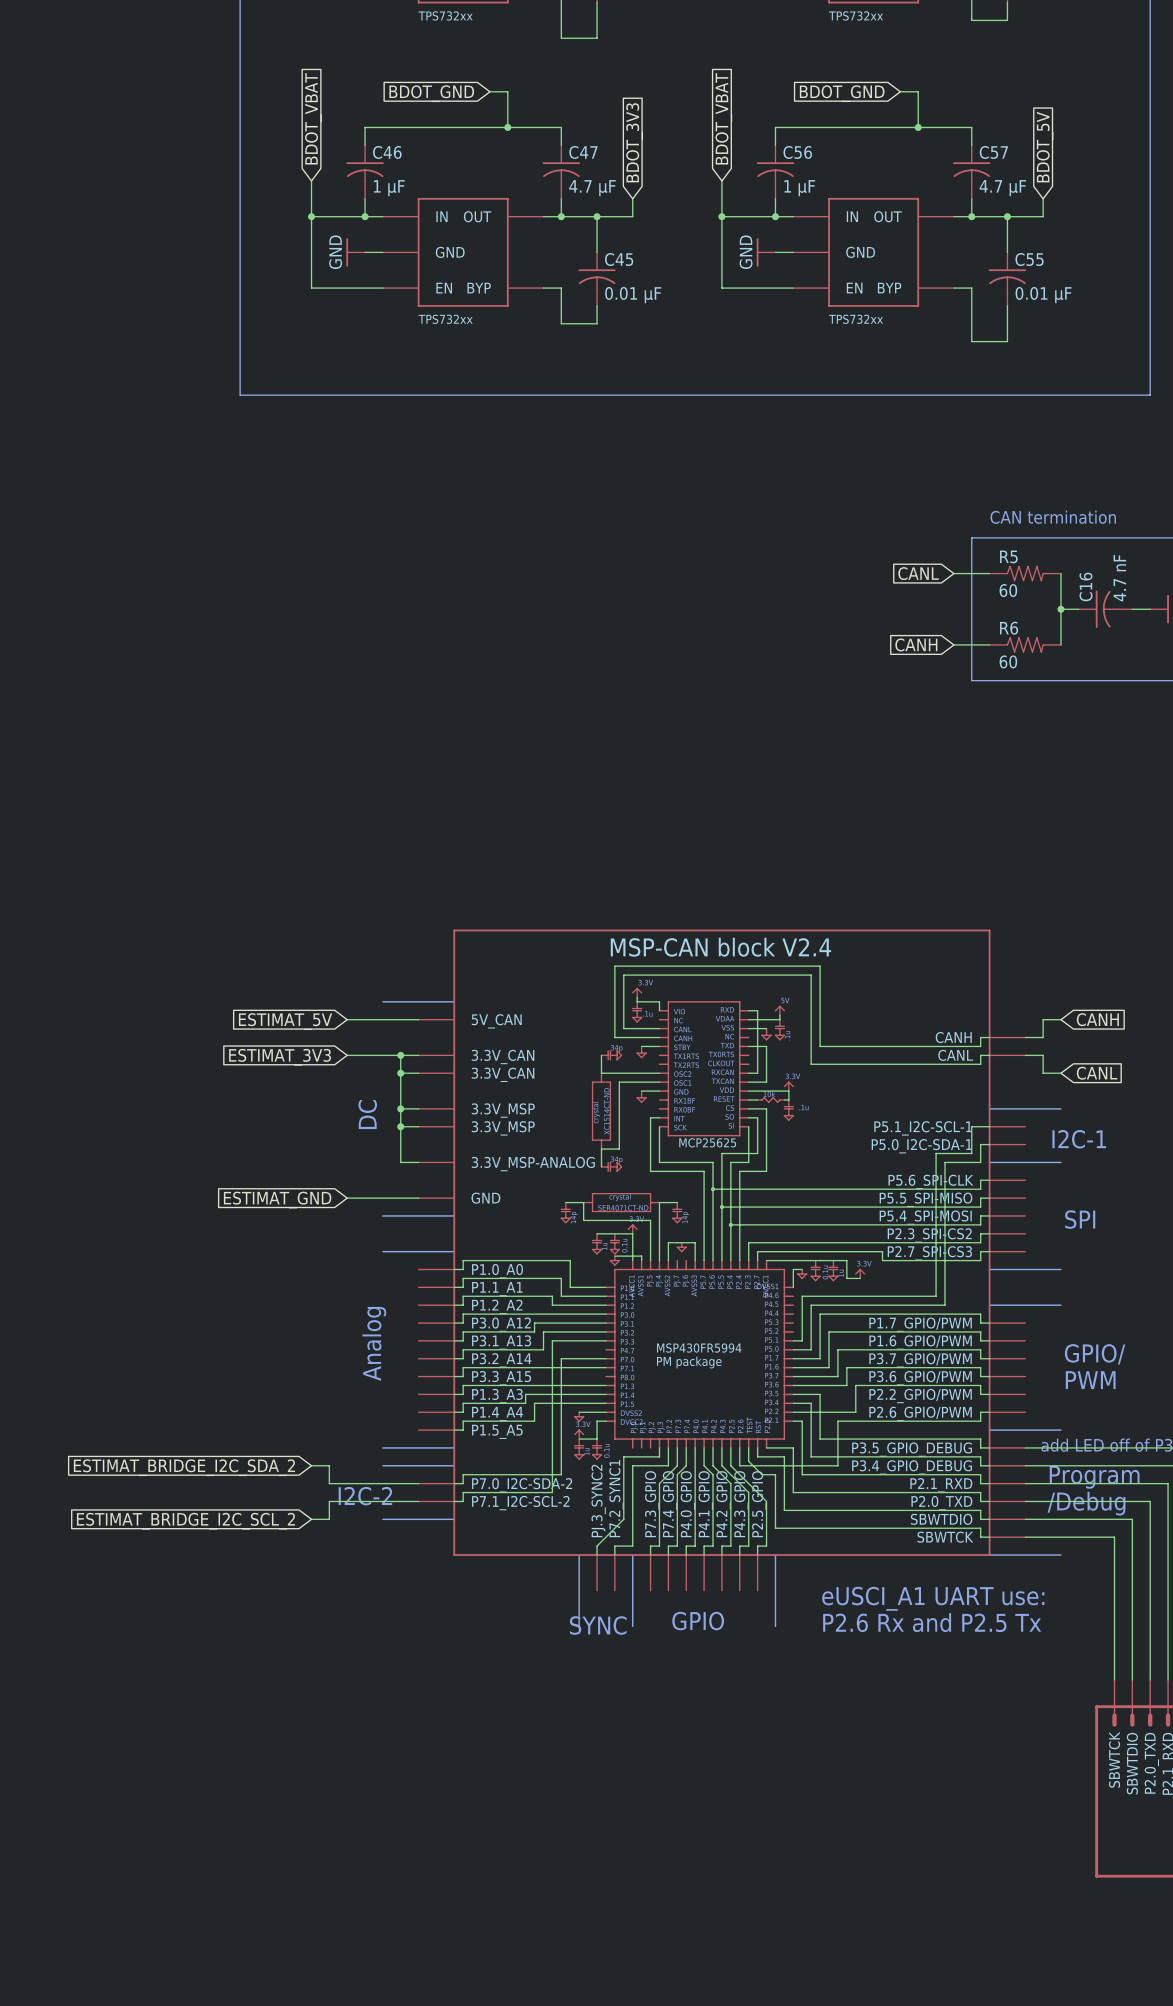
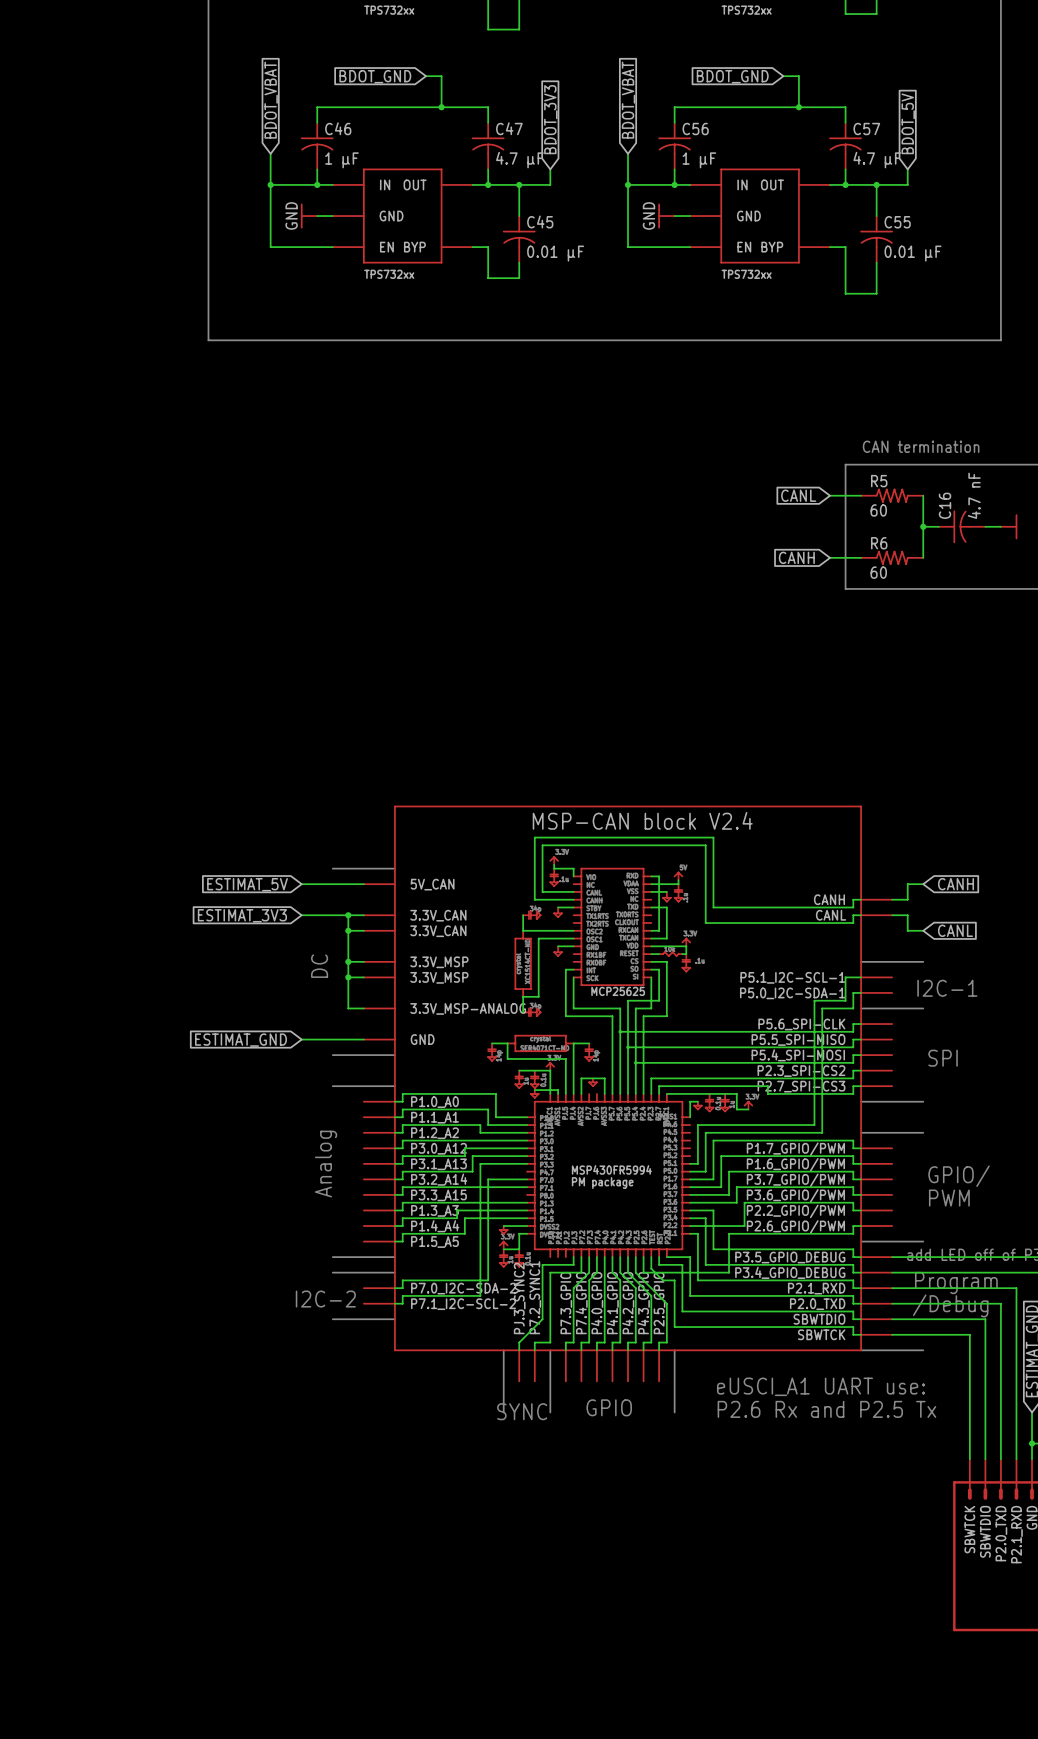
wire: (311, 1465) (329, 1465) (329, 1483) (418, 1483) -> none
global label: ESTIMAT_BRIDGE_I2C_SDA_2 (184, 1467) -> none
wire: (418, 1501) (329, 1501) (329, 1519) (311, 1519) -> none
global label: ESTIMAT_BRIDGE_I2C_SCL_2 (185, 1521) -> none

